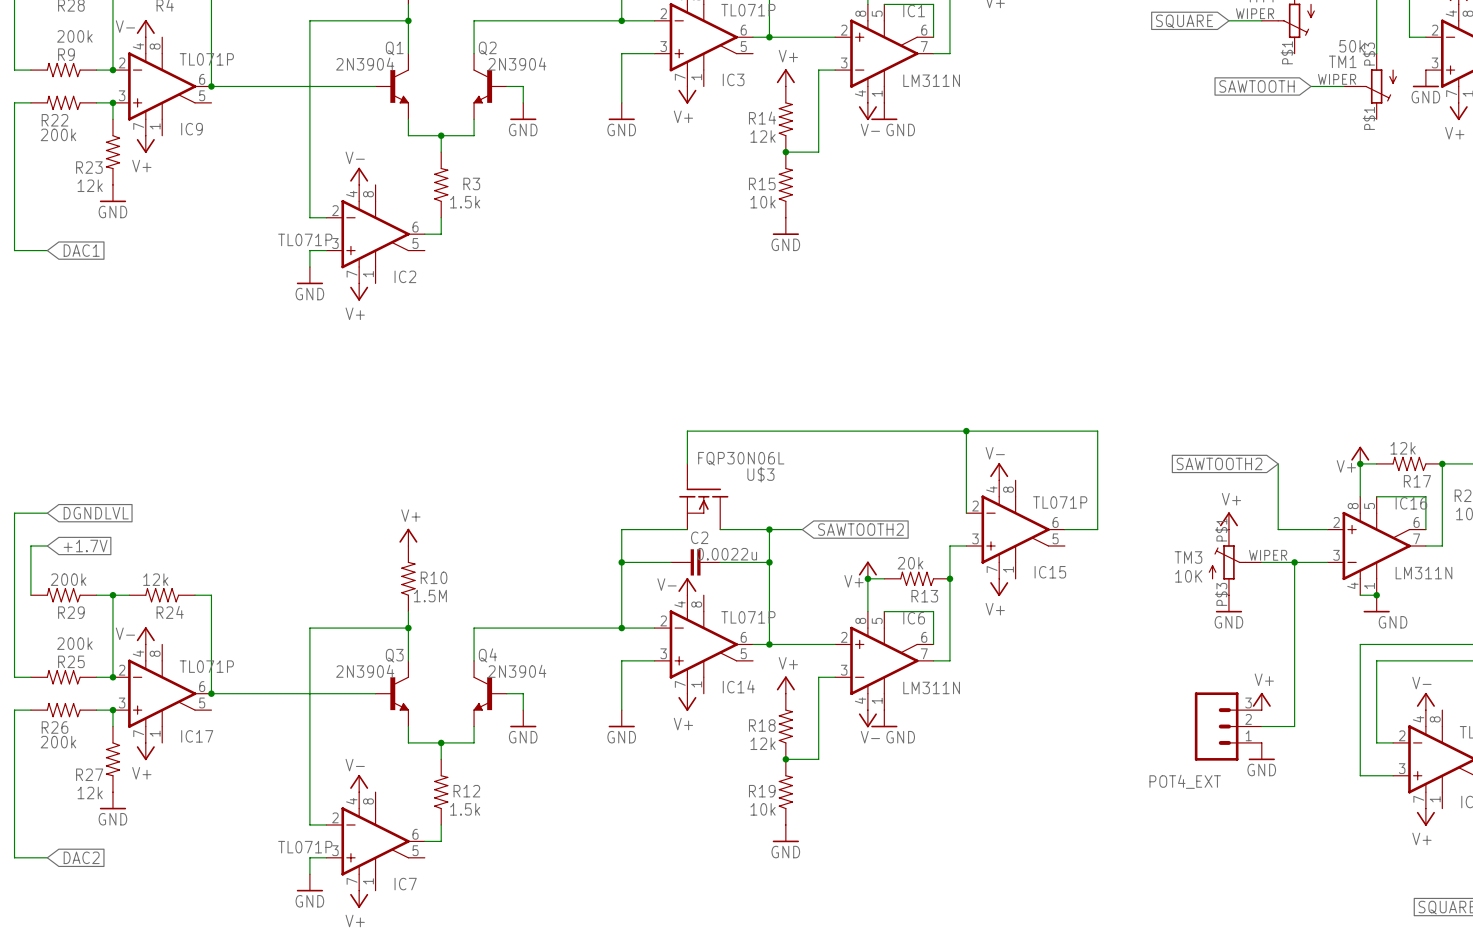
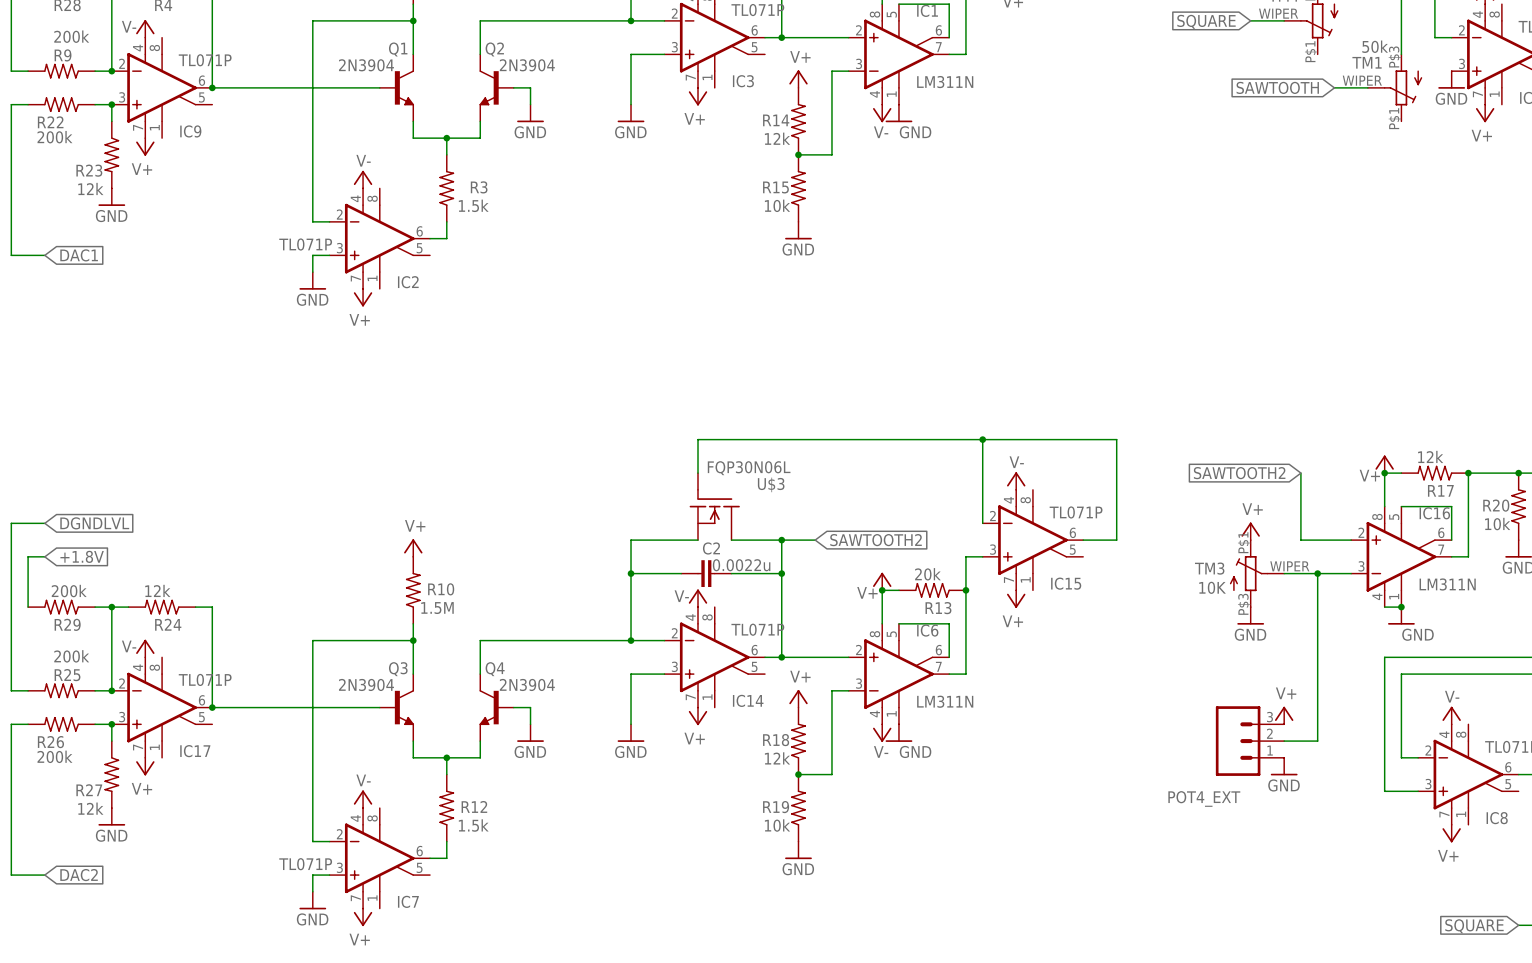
global label: +1.7V (85, 546) -> +1.8V (82, 556)

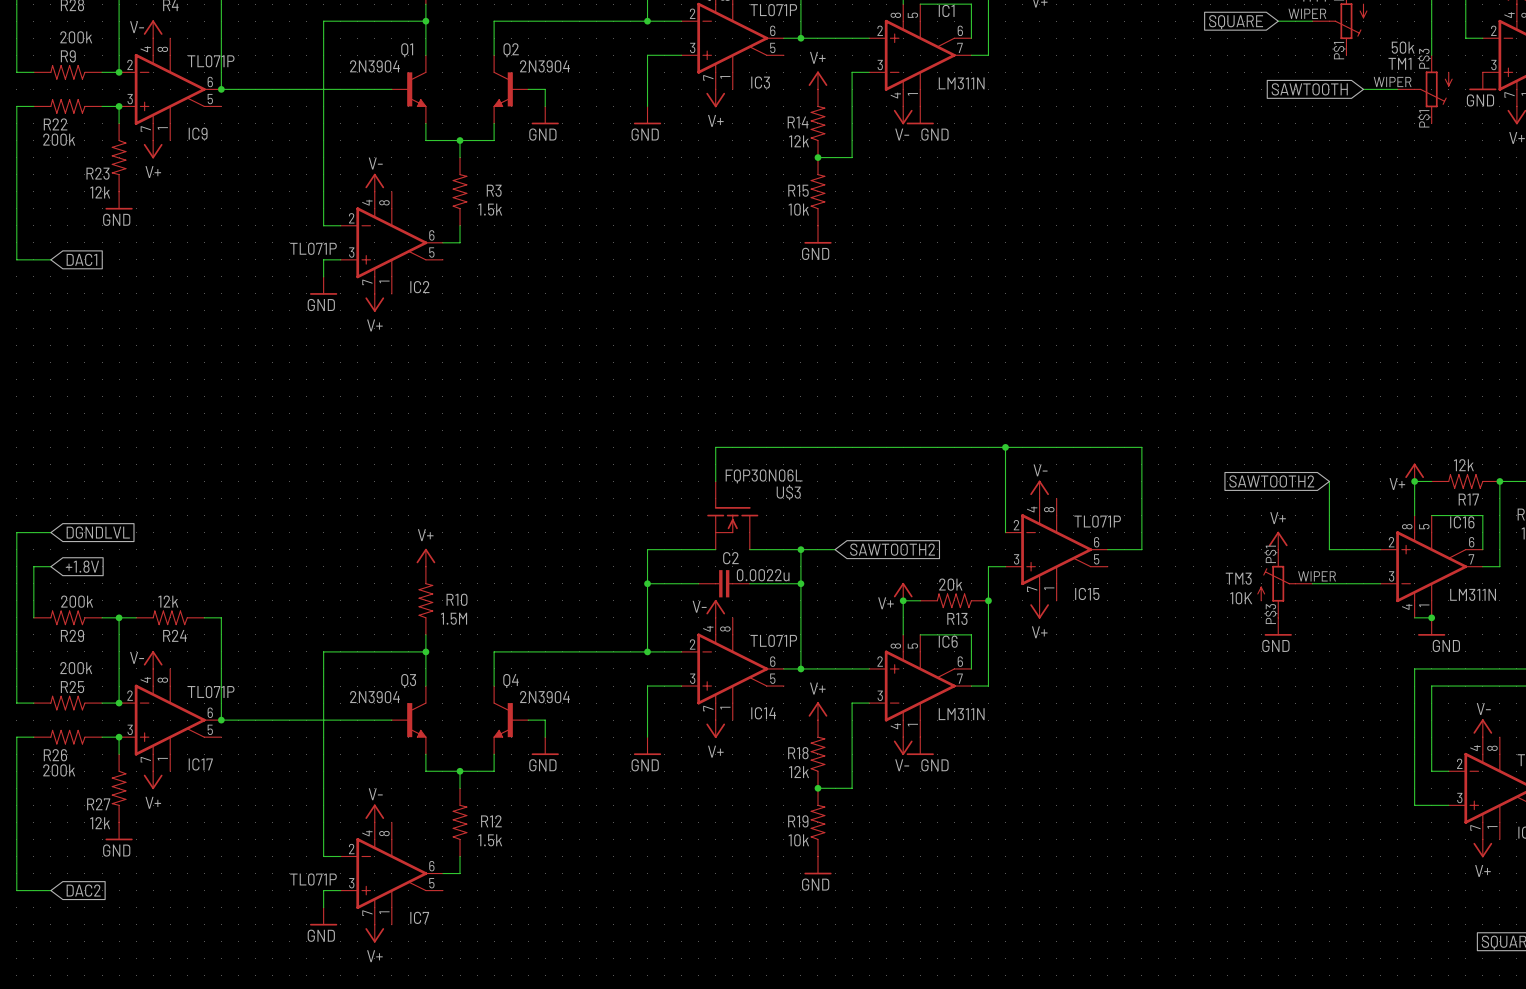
wire: (1317, 573) (1317, 741) (1284, 741) -> none
junction: (1317, 573) -> none
power symbol: V+ (1284, 715) -> none
POT4_EXT: (1250, 741) -> none
power symbol: GND (1284, 766) -> none

